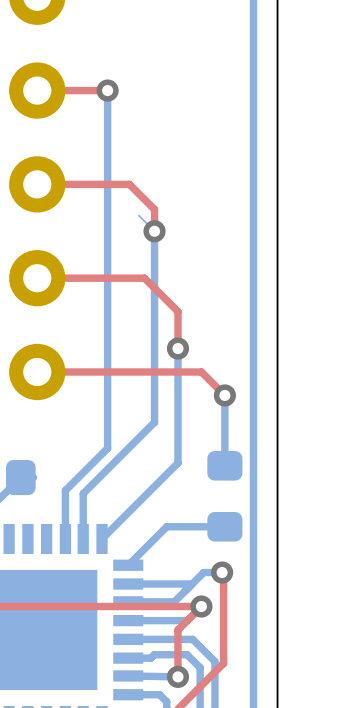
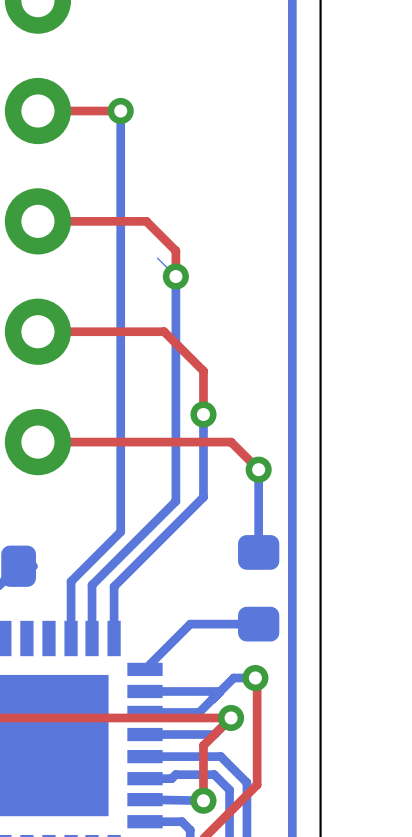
bottom track: (177, 418) (177, 463) (102, 538) -> (203, 497) (114, 586) (114, 638)

